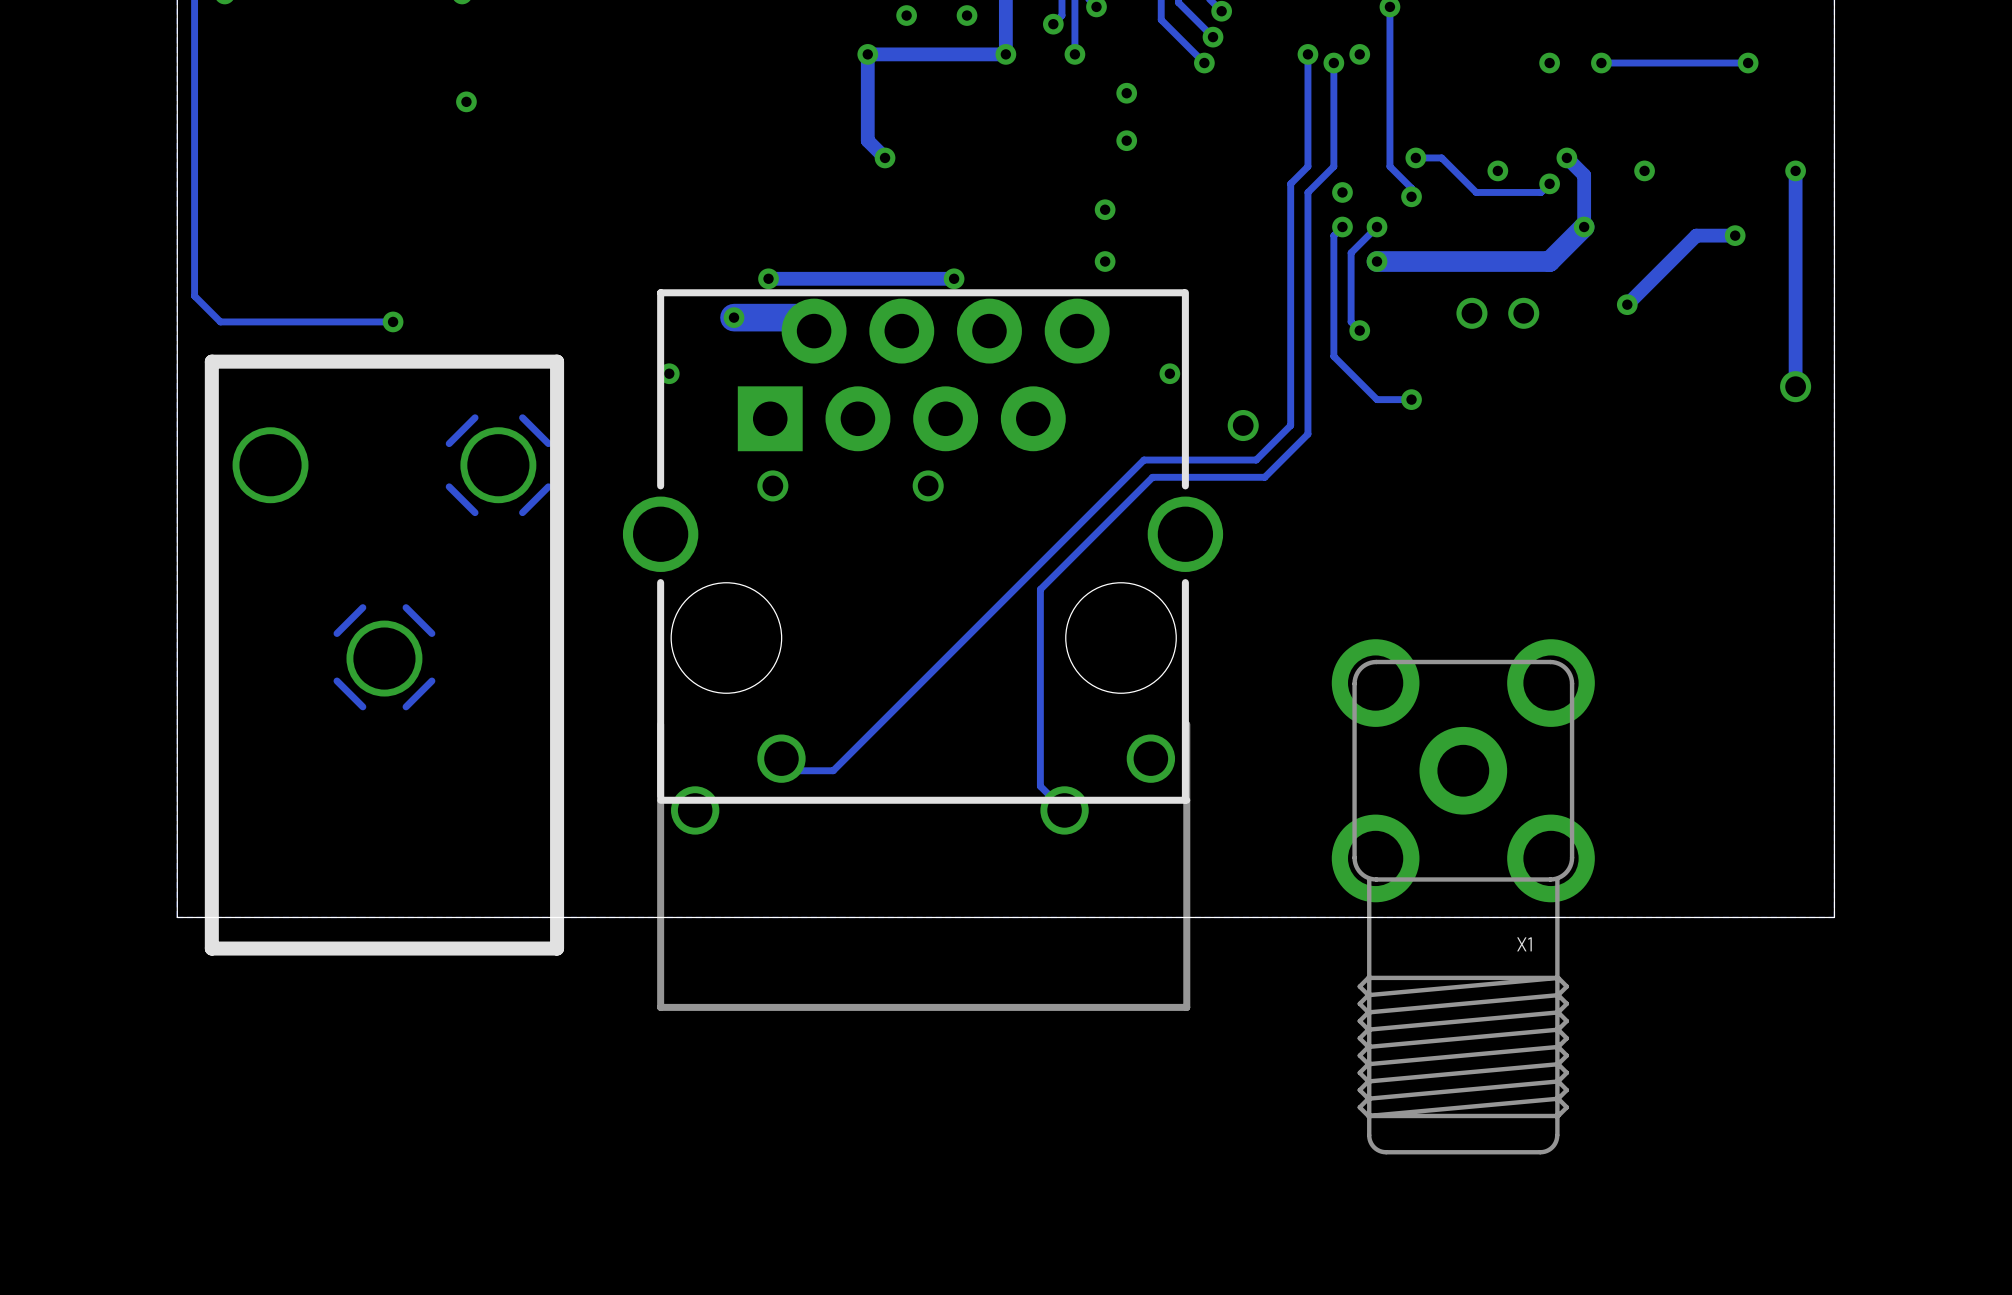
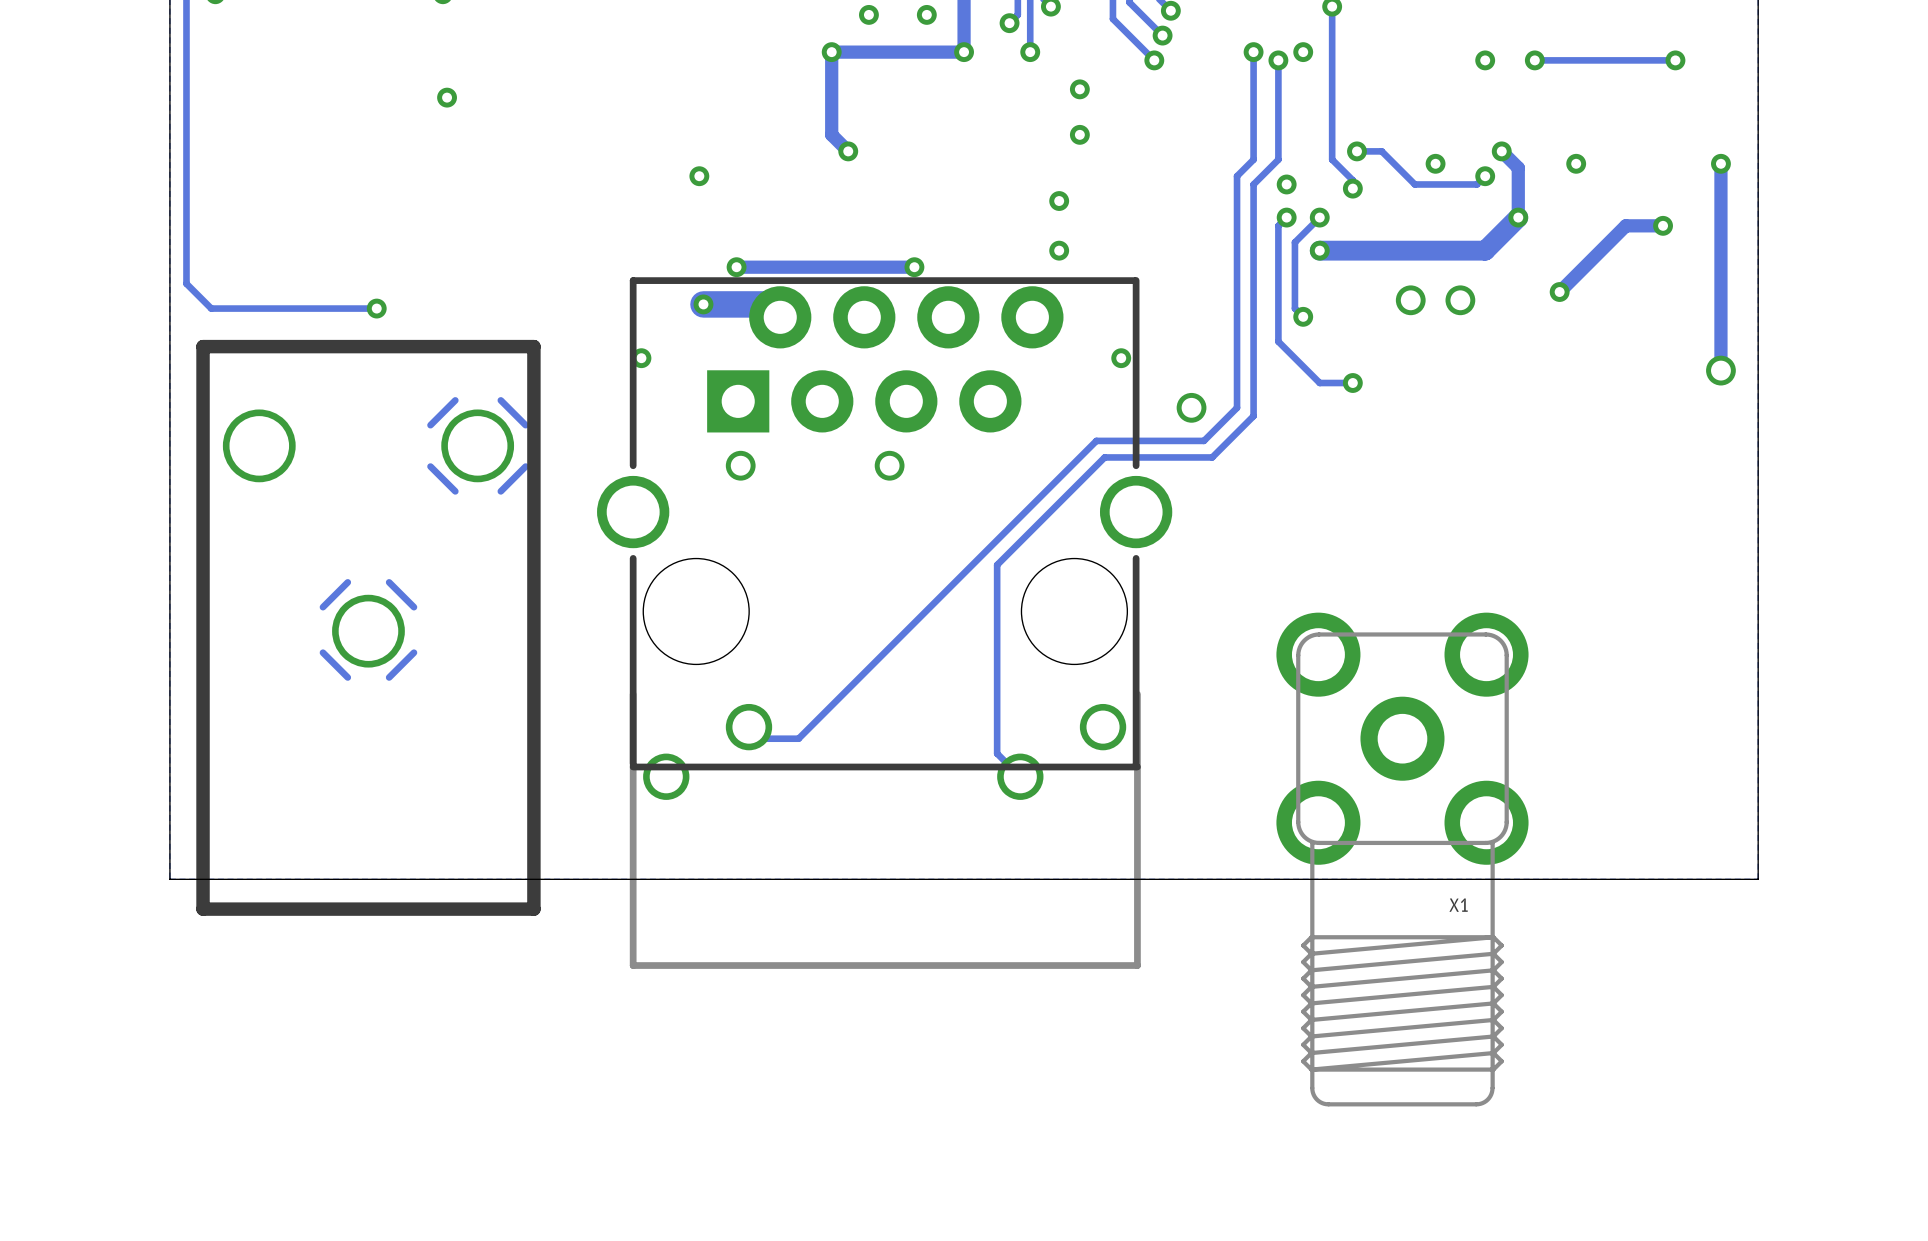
via: none -> (699, 176)

